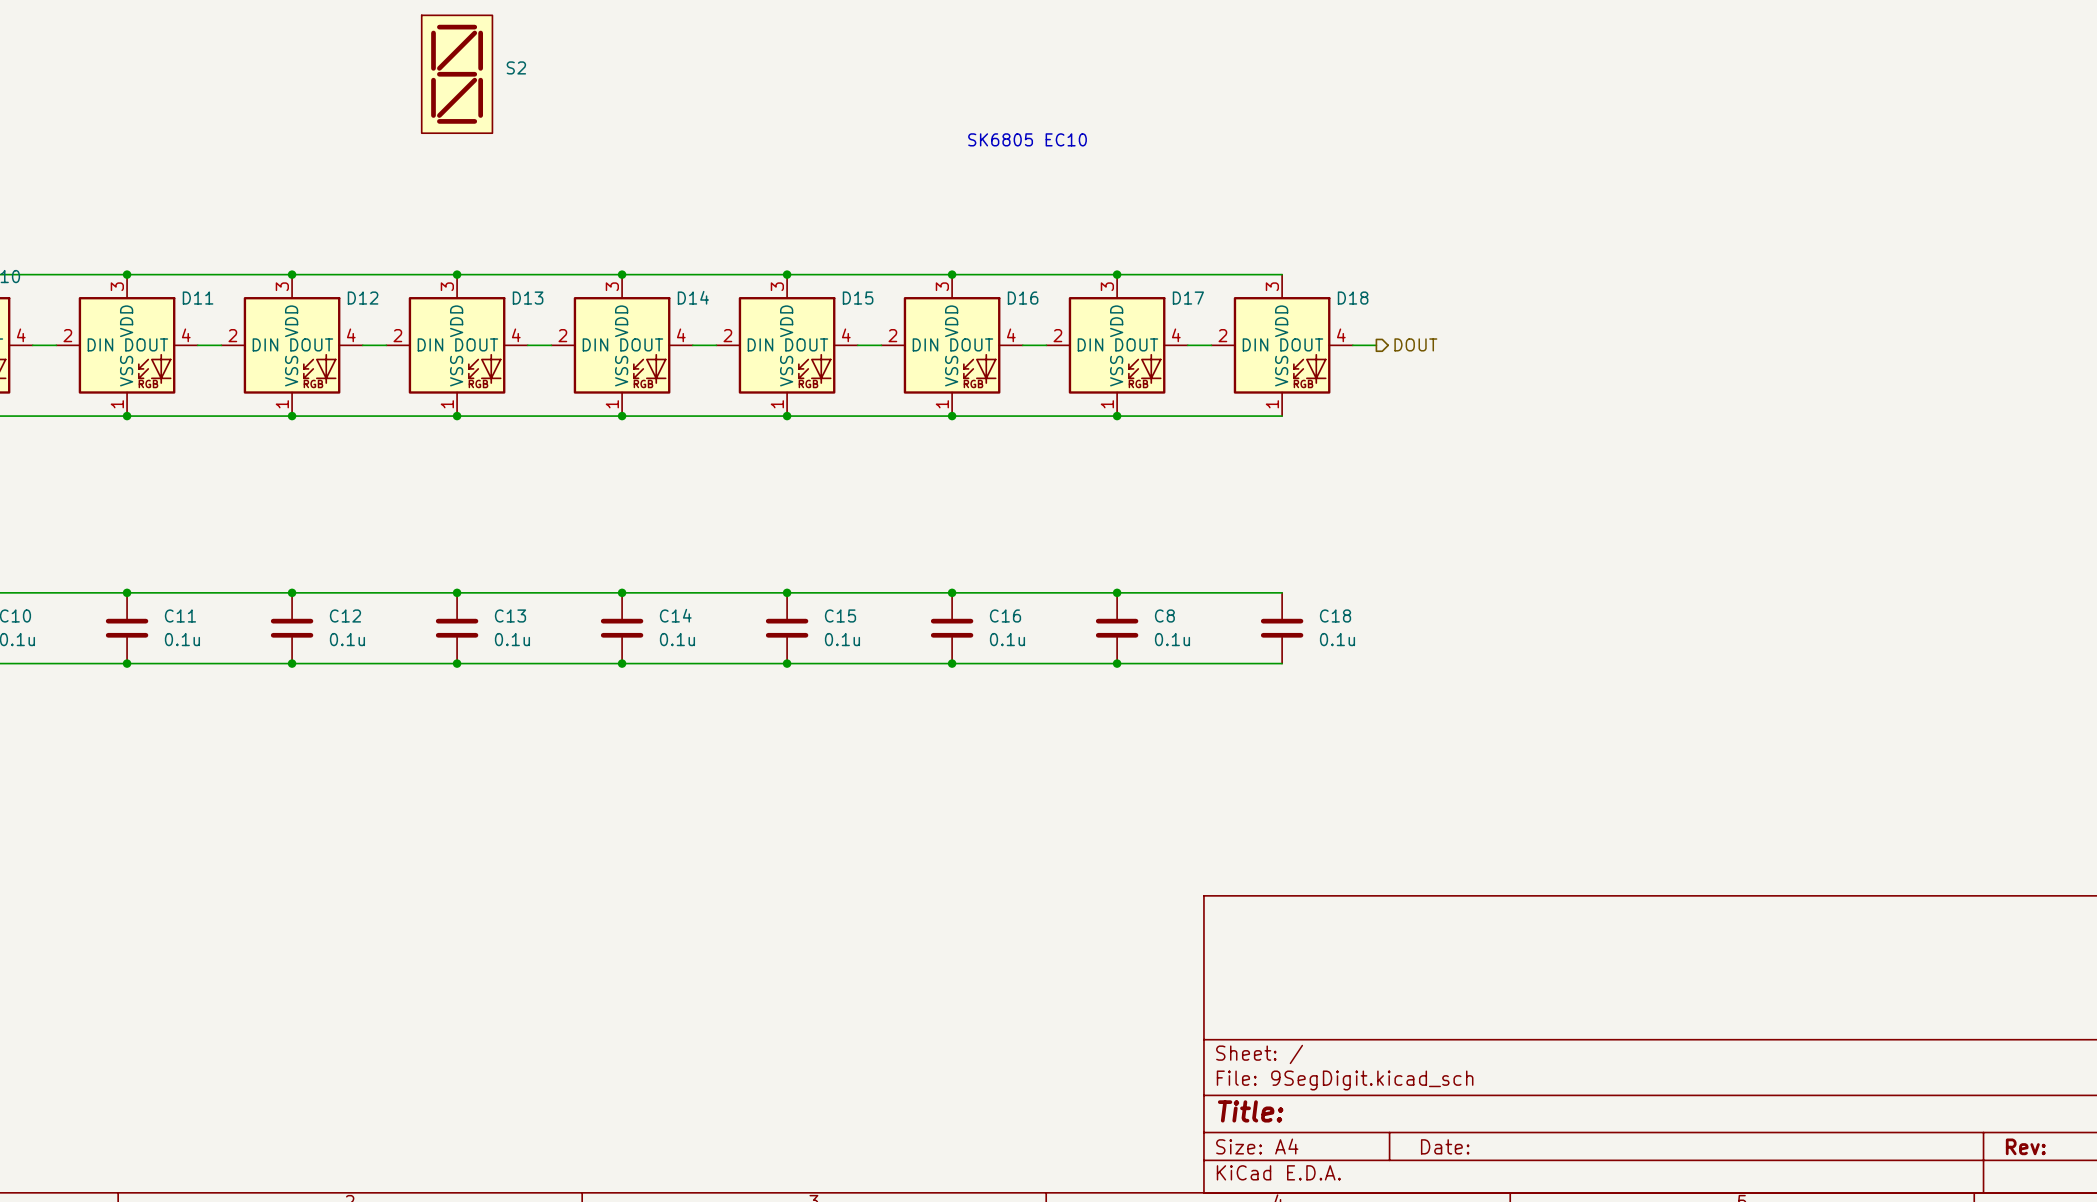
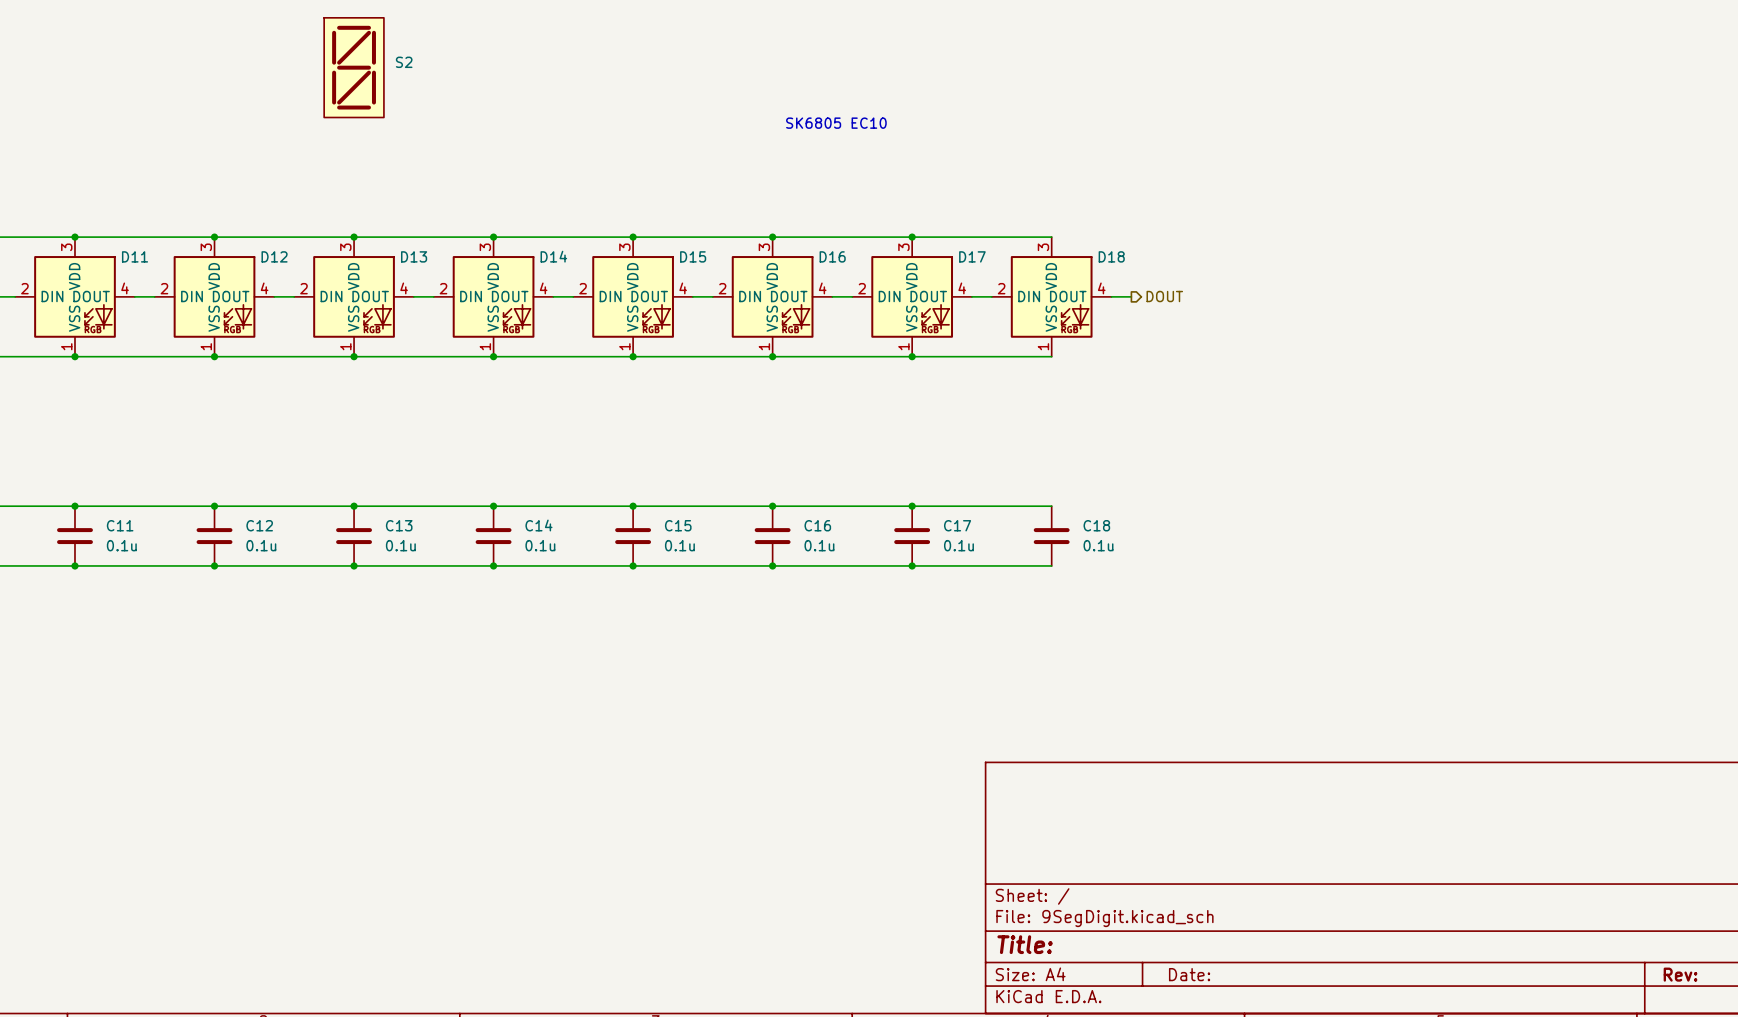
C8 name: C8 (1164, 615) -> C17 (957, 525)

